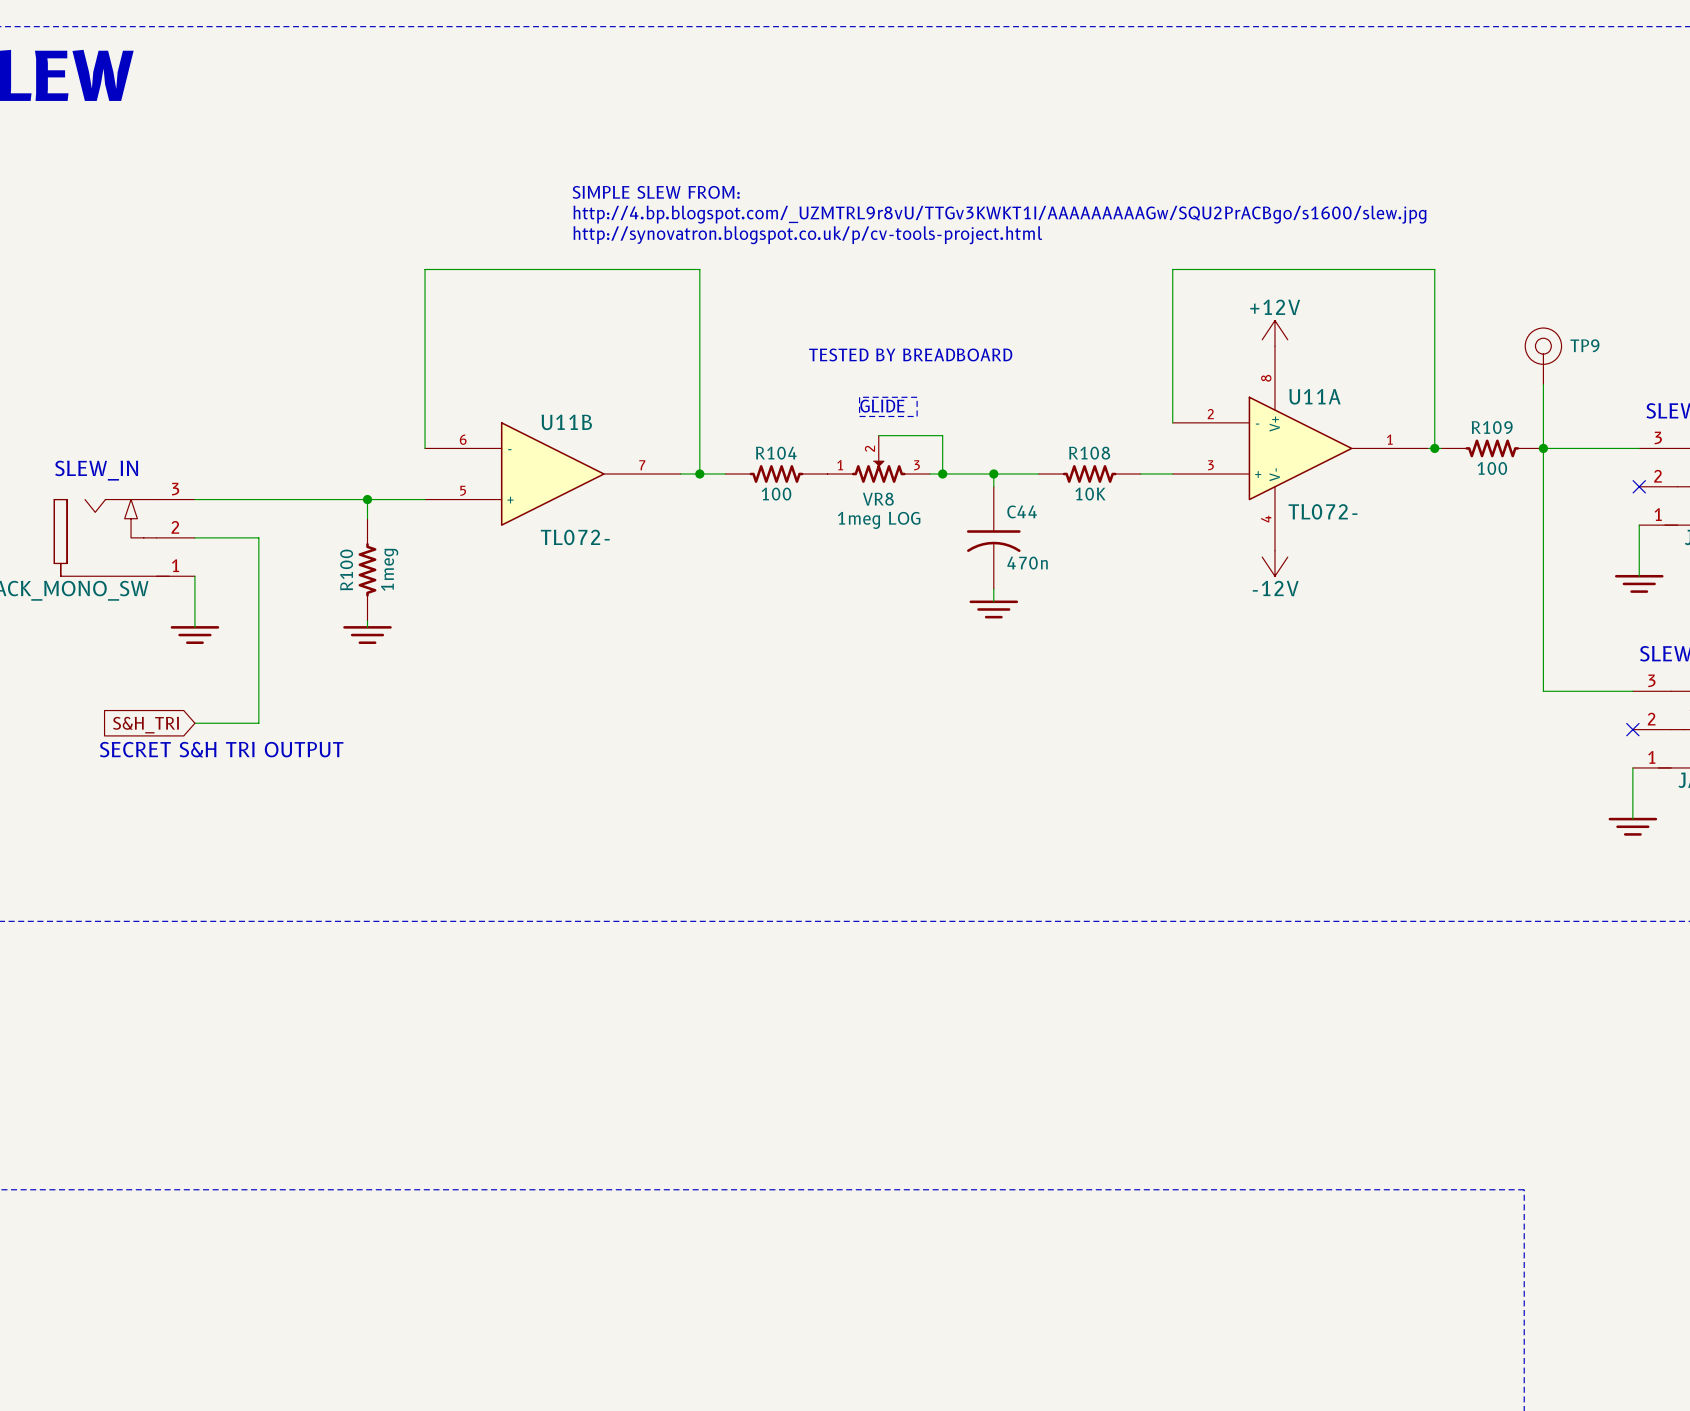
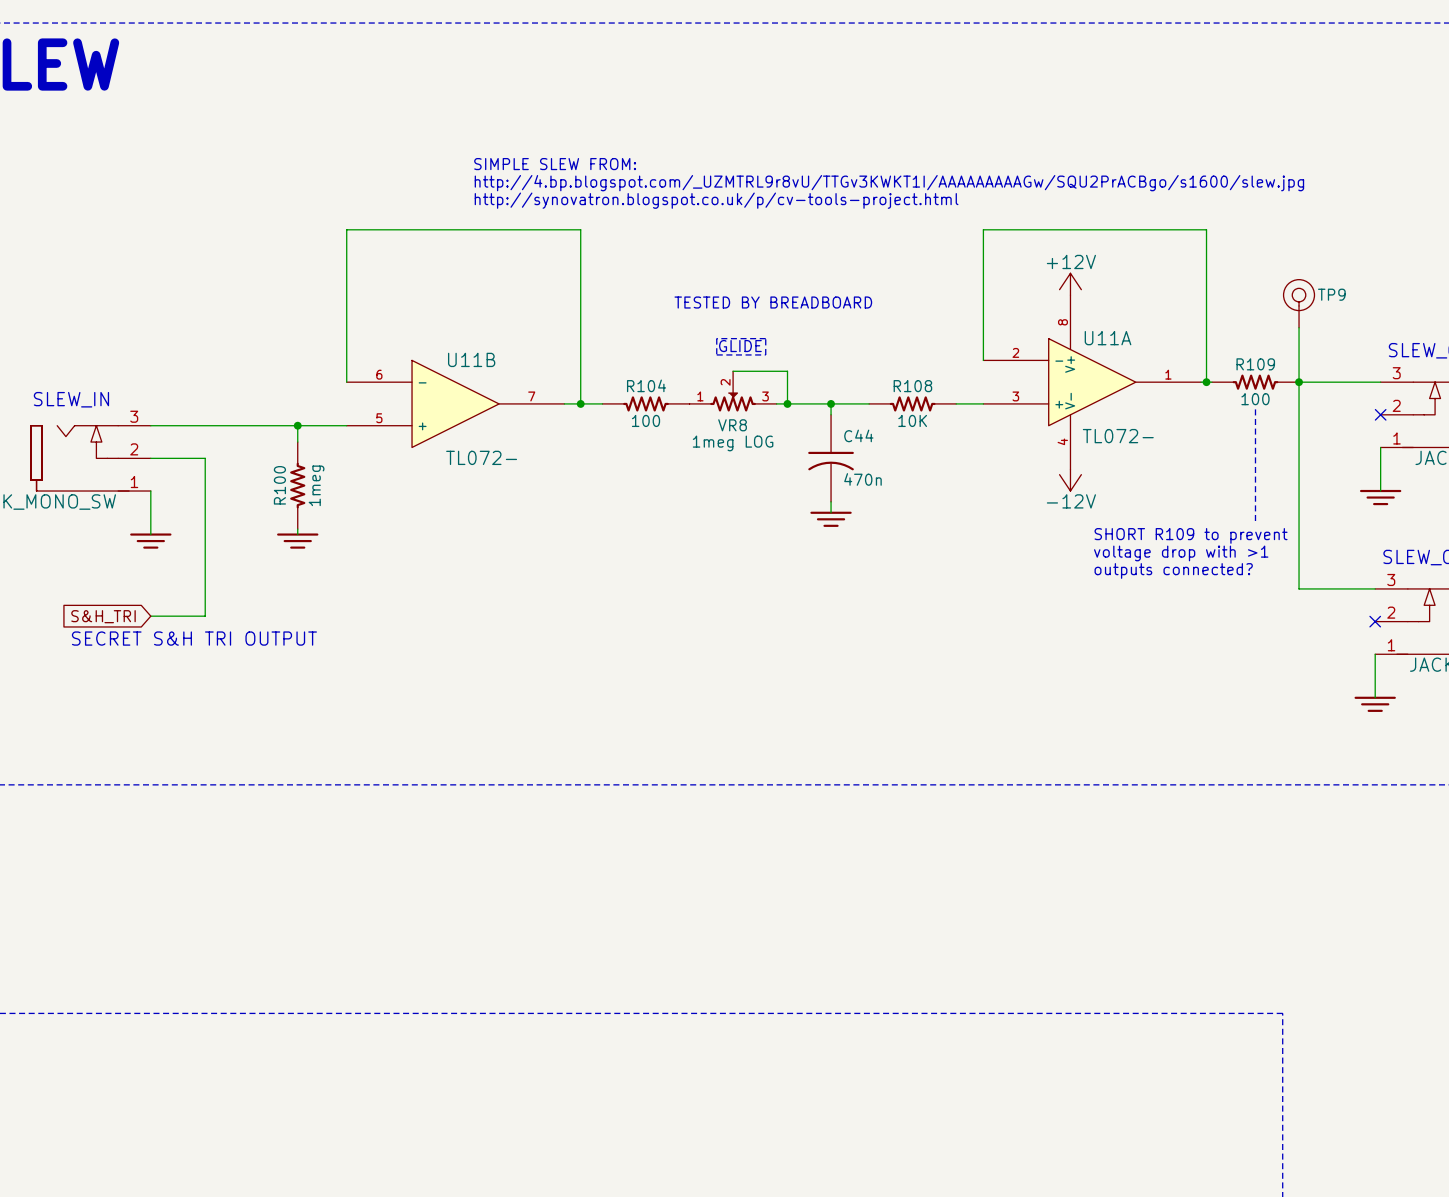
line: none -> (1255, 409) (1255, 523)
text: none -> SHORT R109 to prevent (1191, 535)
text: none -> voltage drop with >1 (1181, 553)
text: none -> outputs connected? (1173, 570)

